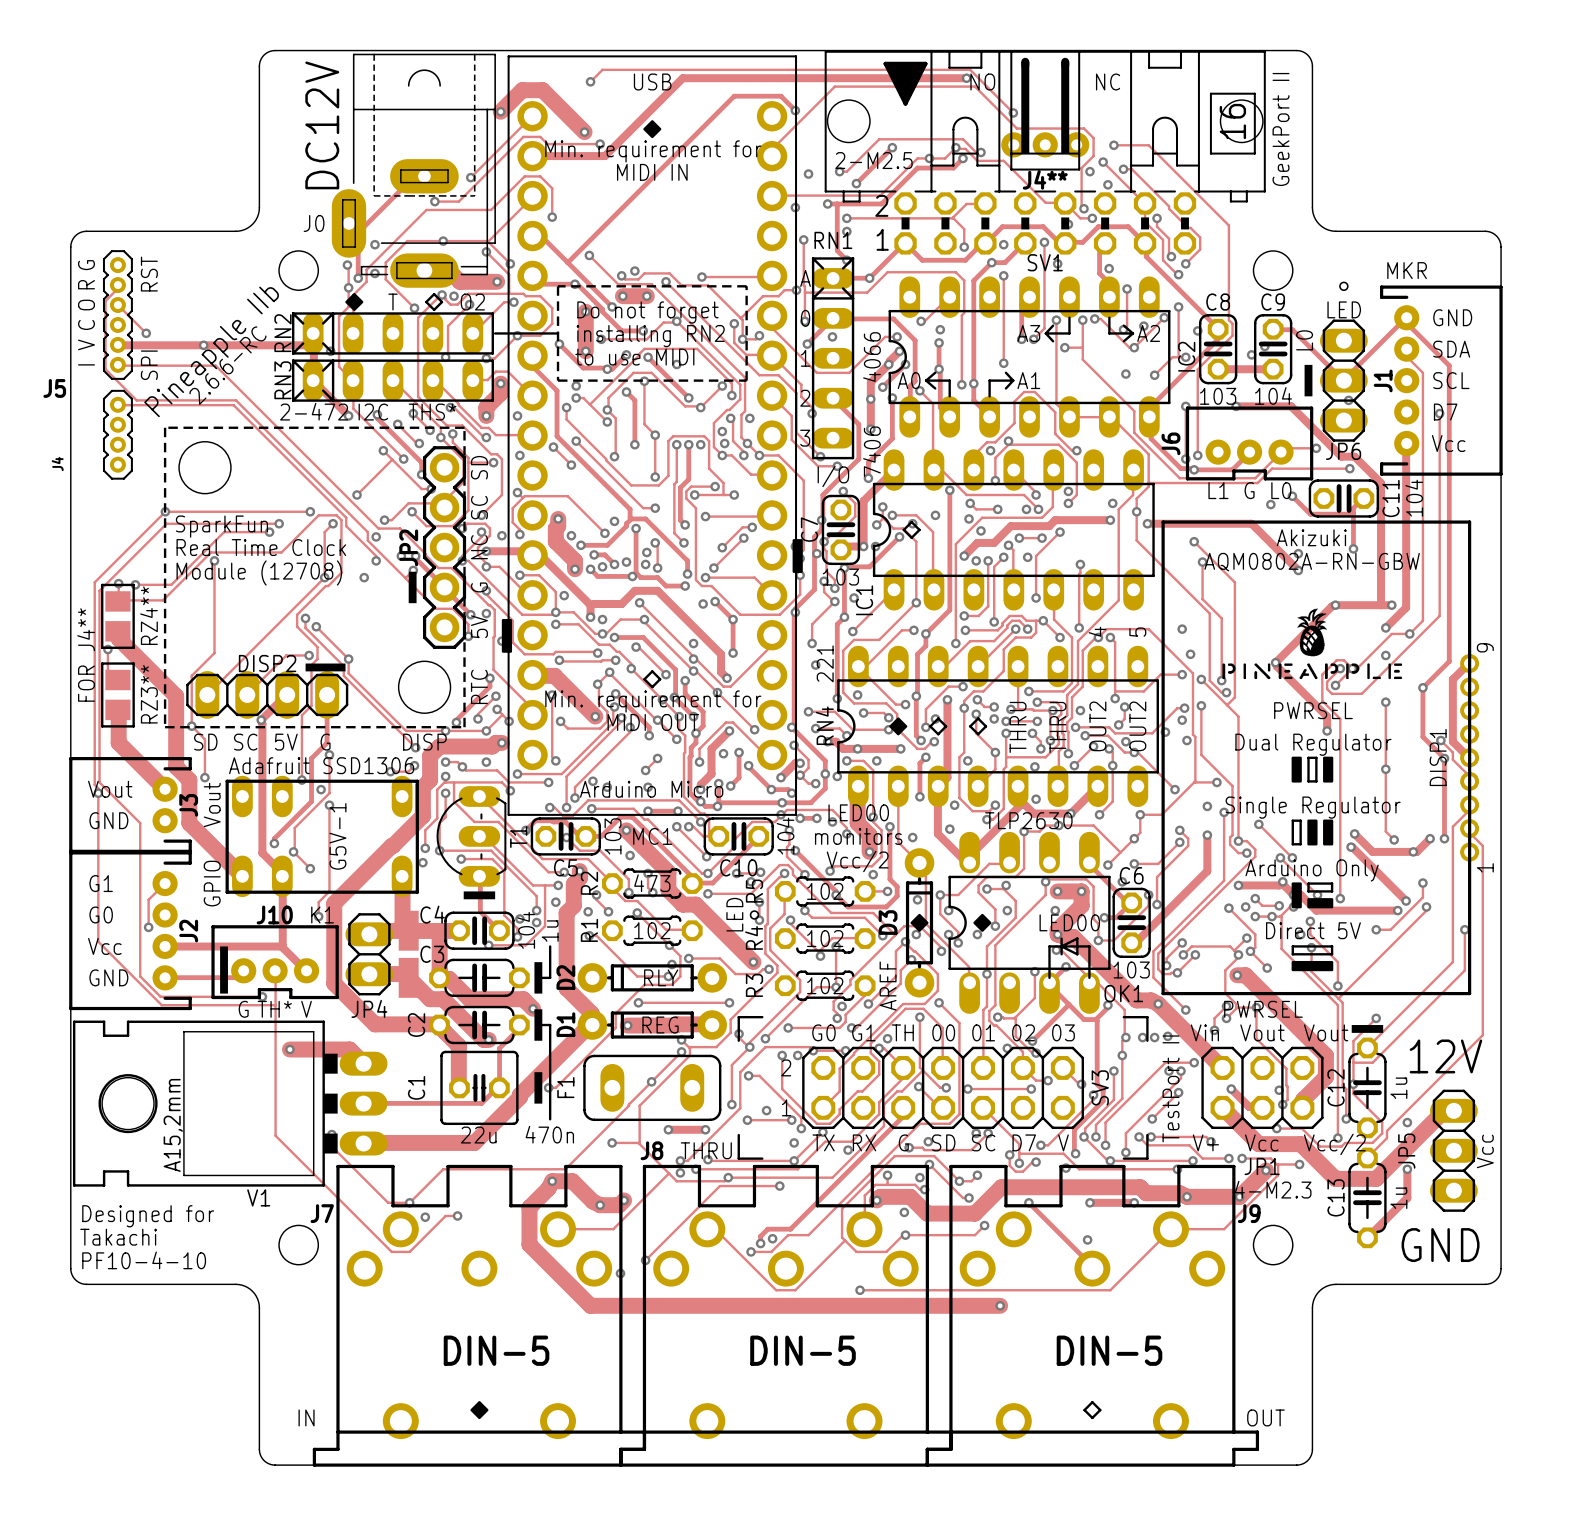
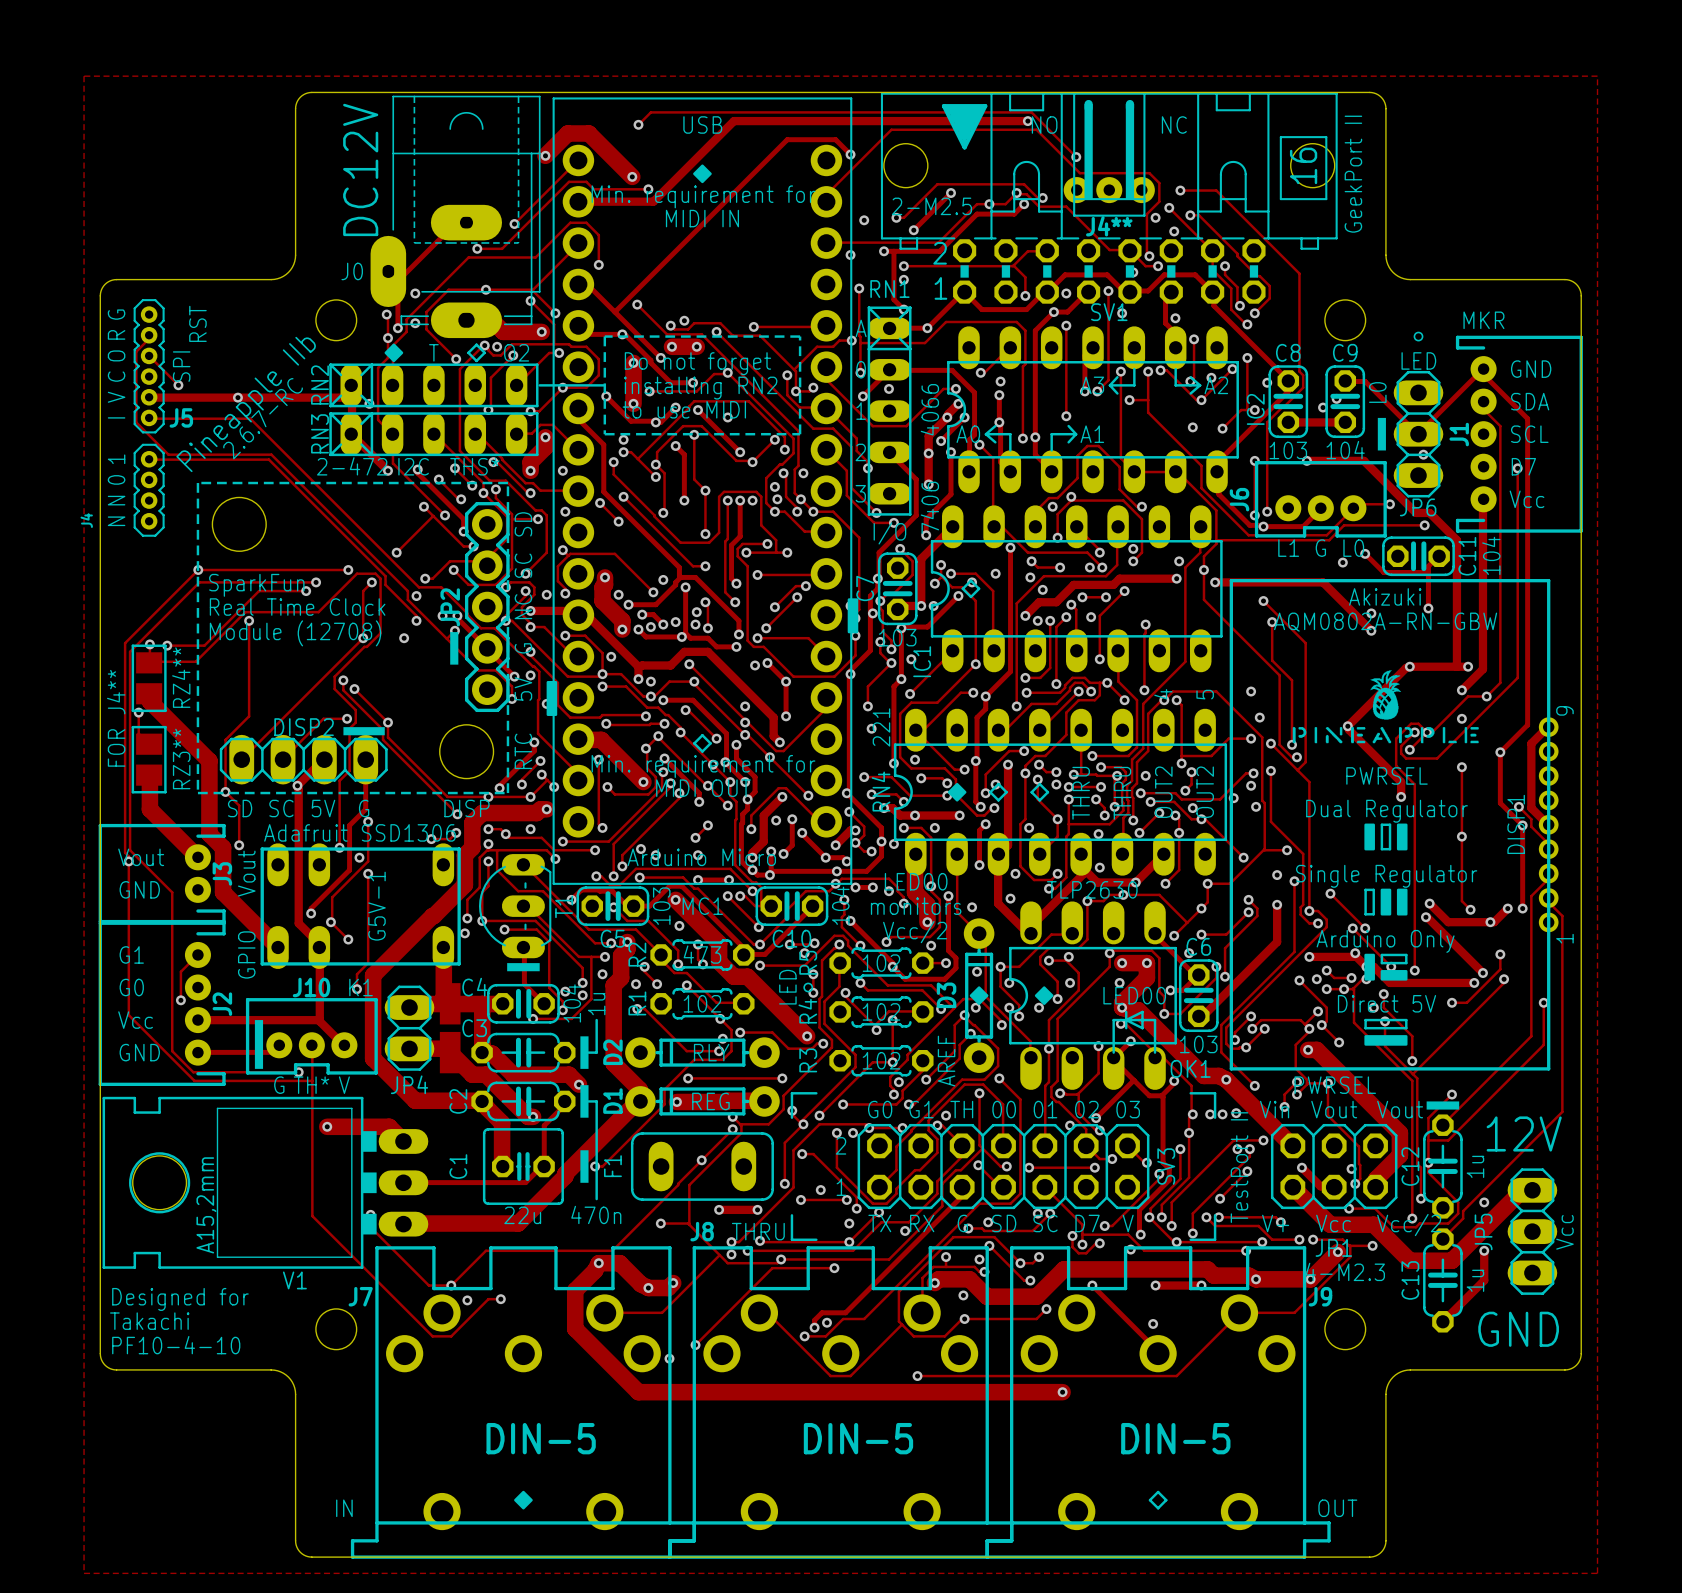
zone outline: none -> (84, 76) (1597, 76) (1597, 1573) (84, 1573) (84, 76)
text position: RST (149, 274) -> RST (197, 323)
text position: SPI (149, 365) -> SPI (181, 366)
text: 2.6.6-RC (227, 365) -> 2.6.7-RC (263, 418)
J5 name position: J5 (54, 388) -> J5 (181, 417)
text: none -> 1 (116, 459)
text: none -> 0 (116, 479)
text: none -> N (116, 500)
text: none -> N (116, 521)

